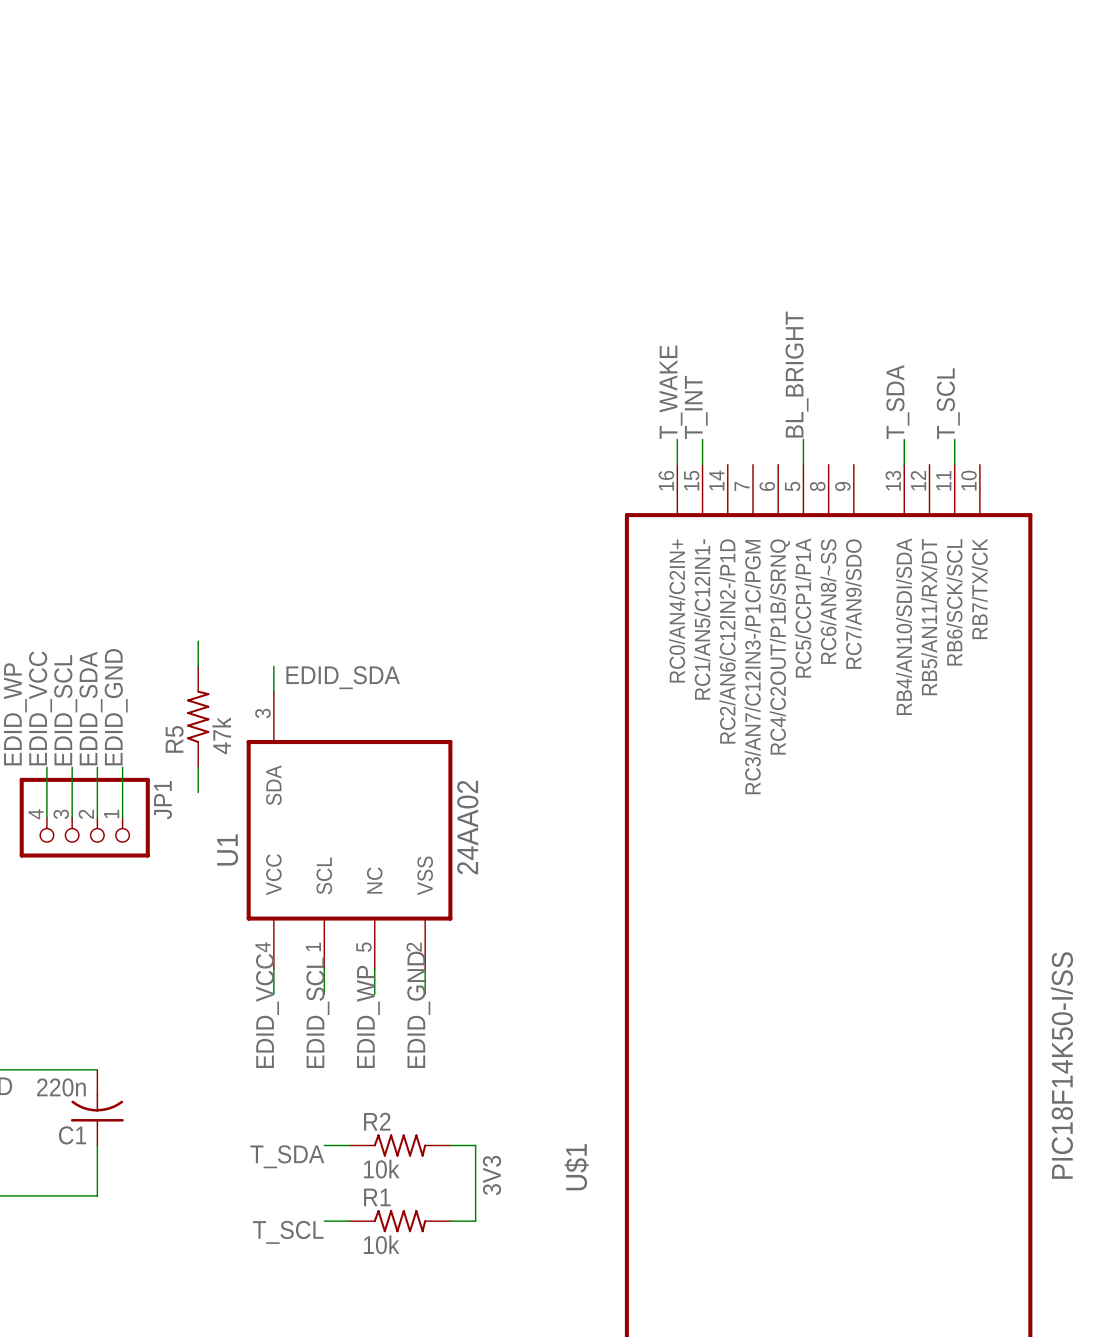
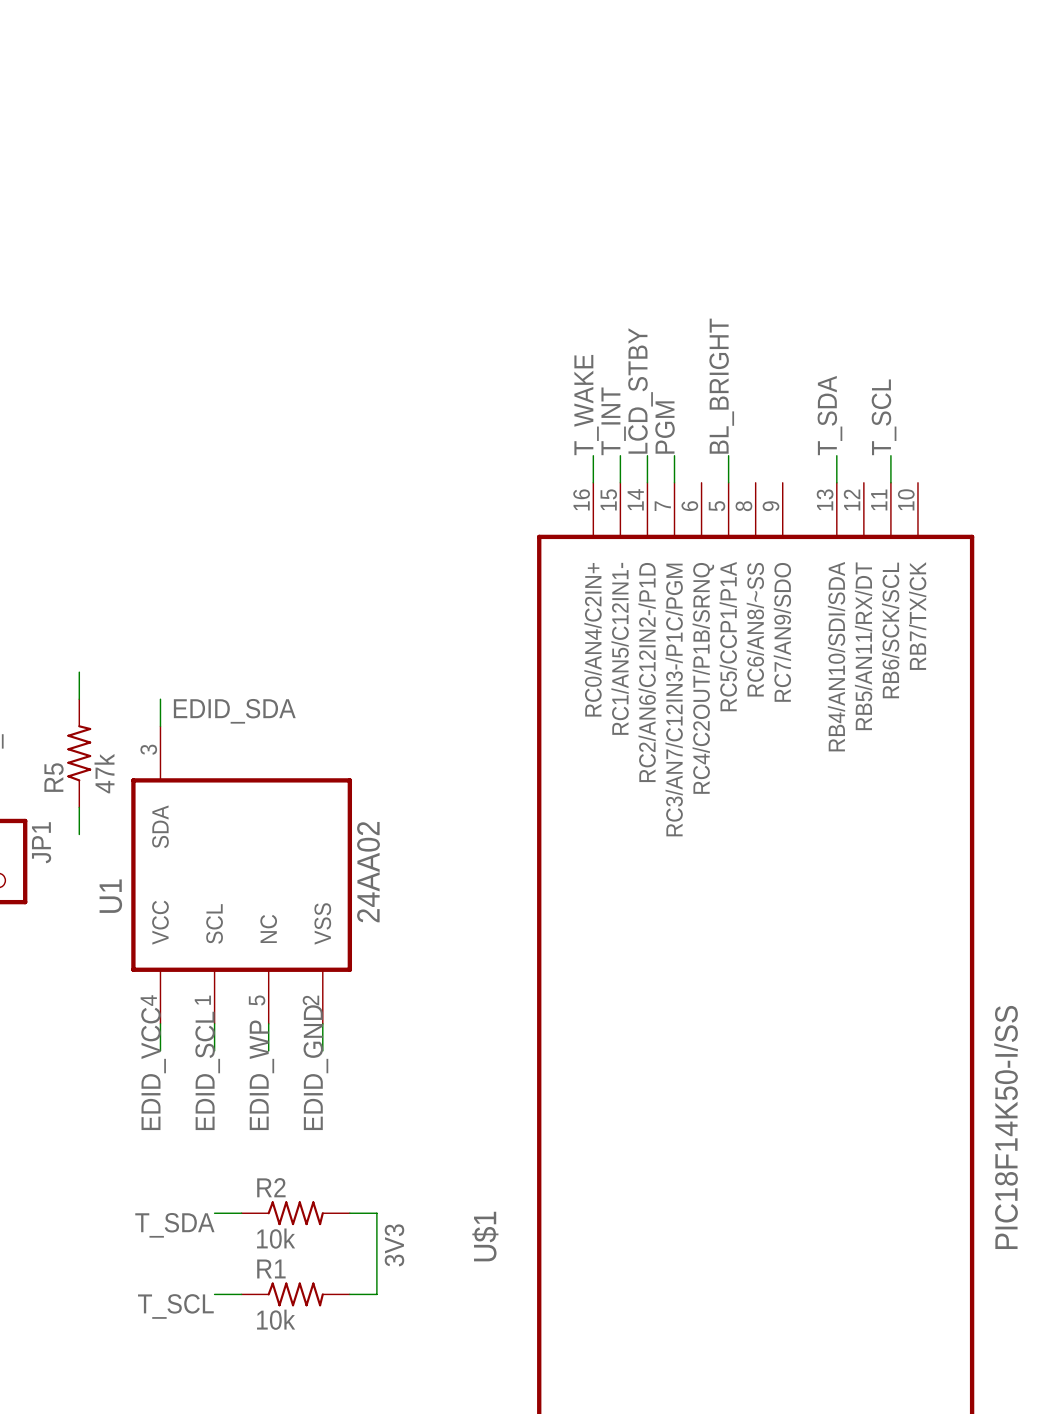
label: none -> LCD_STBY (640, 390)
label: none -> PGM (665, 427)
wire: none -> (647, 455) (647, 482)
wire: none -> (674, 455) (674, 482)

